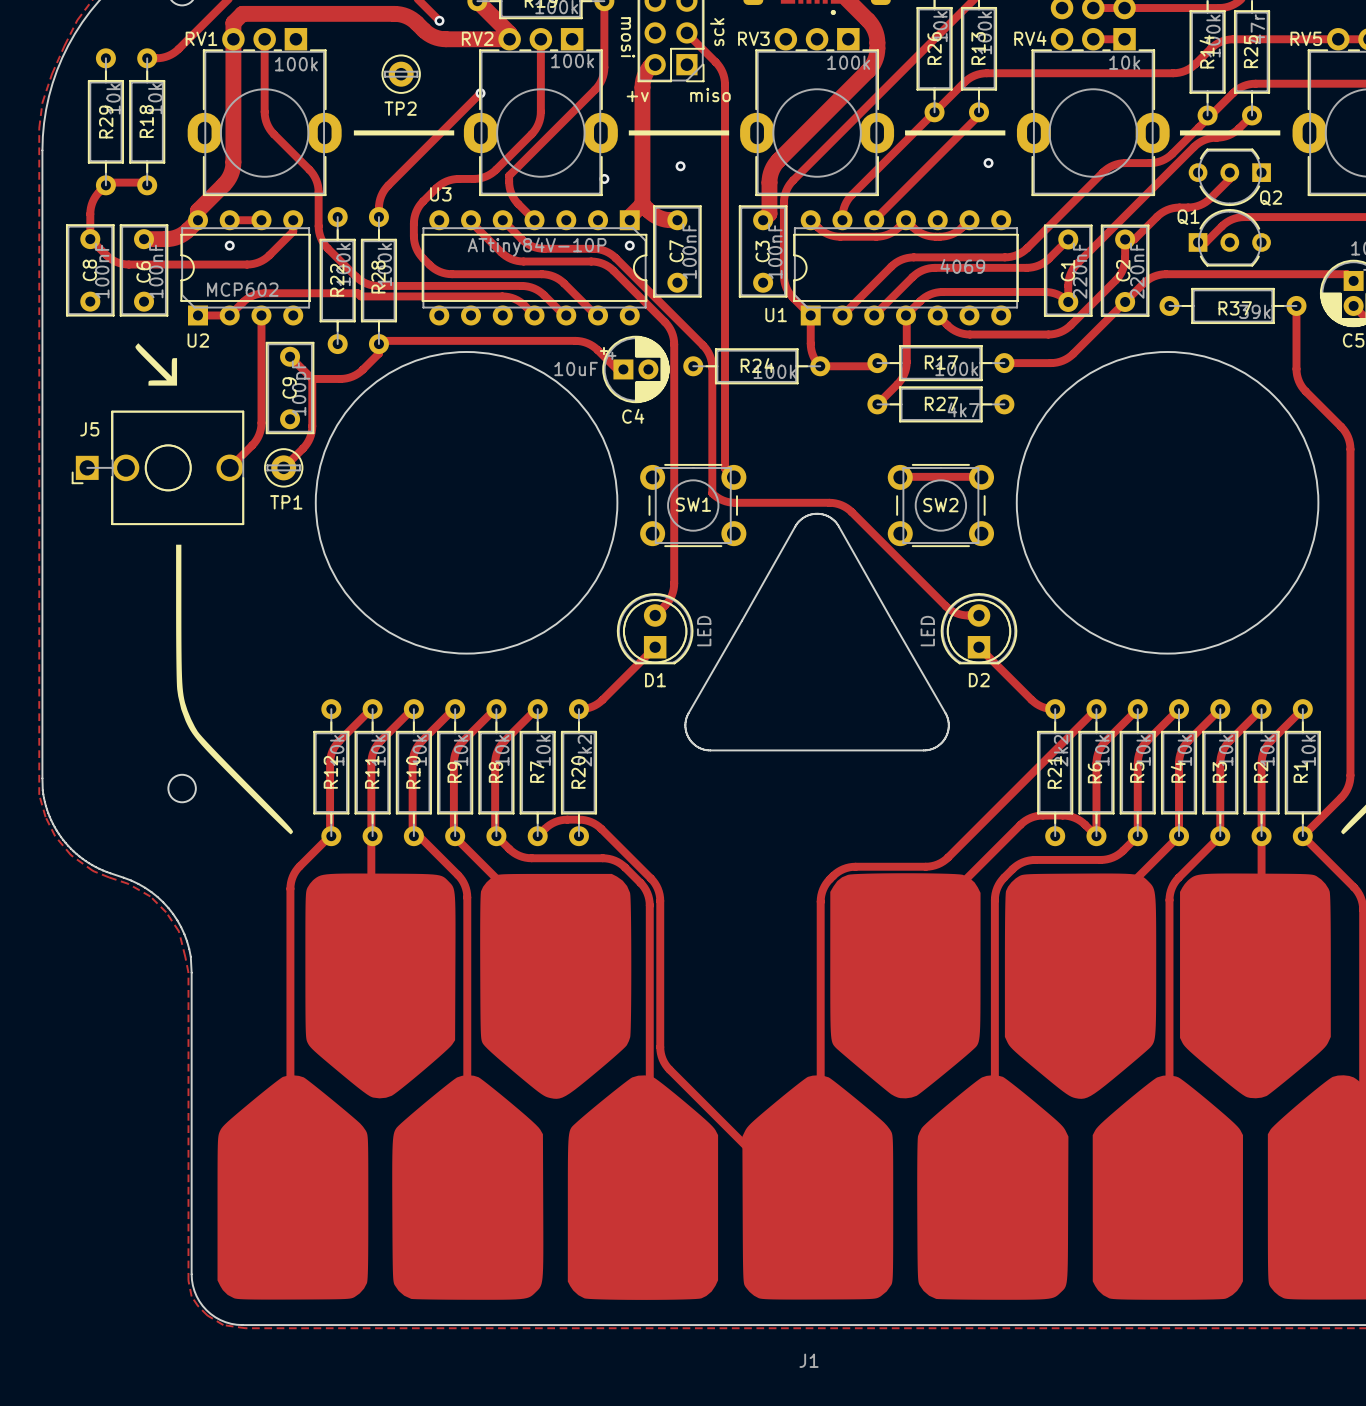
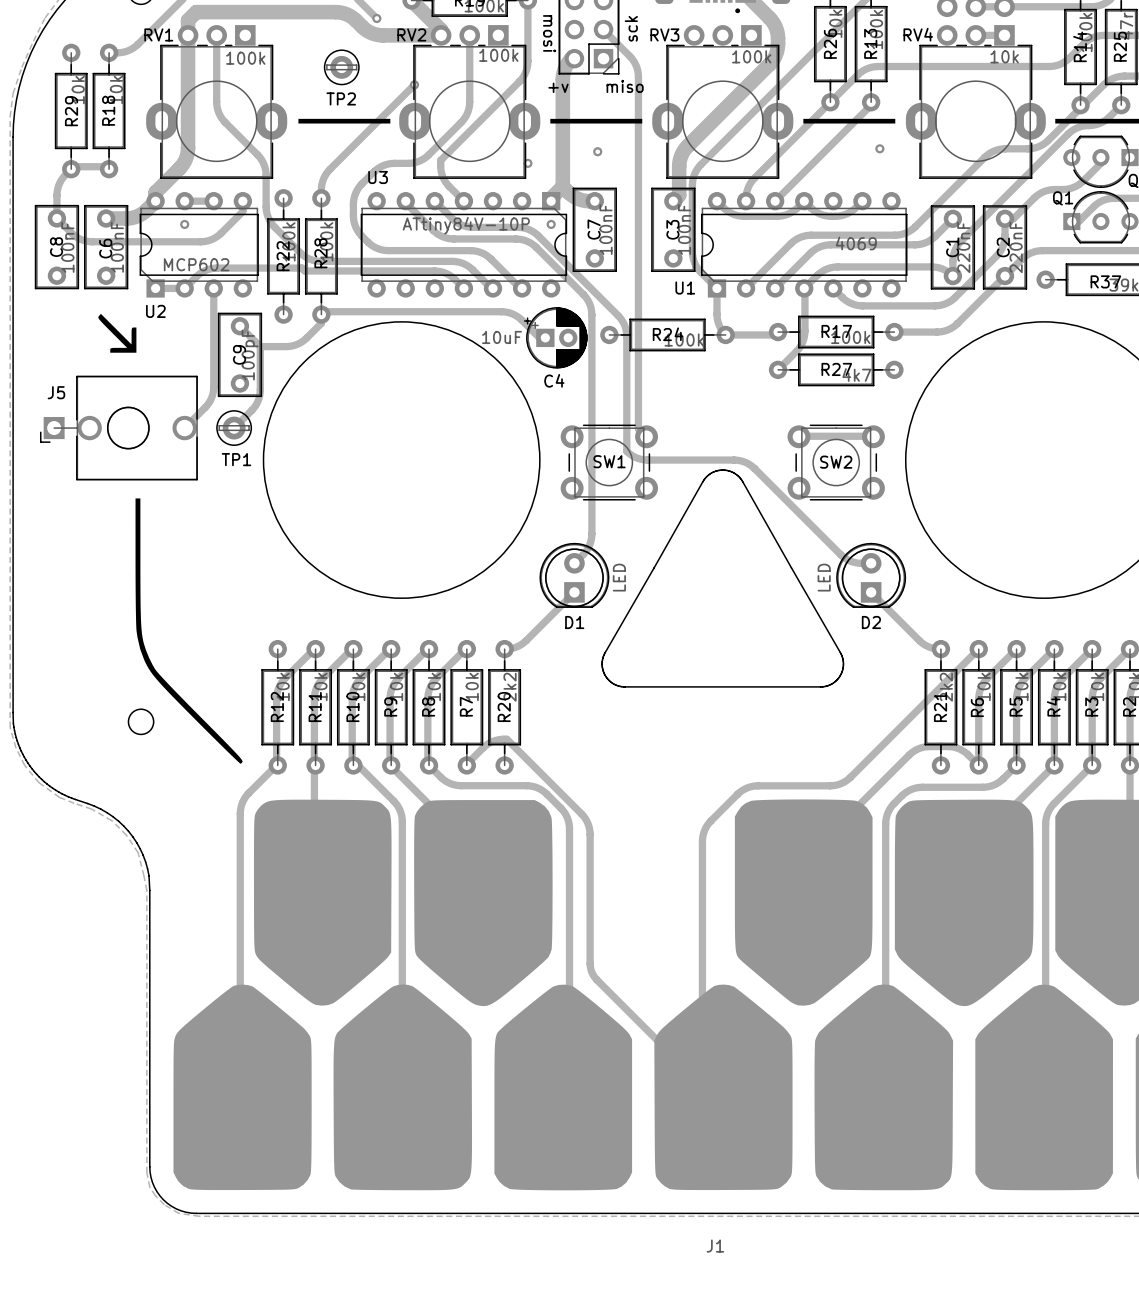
track: none -> (466, 764) (487, 744) (495, 740) (506, 739) (583, 816) (589, 831) (590, 963) (591, 972) (596, 979) (726, 1109)
track: (537, 836) (549, 824) (558, 821) (578, 819) (591, 822) (601, 828) (654, 883) (660, 897) (660, 1047) (664, 1062) (815, 1215) (820, 1215) (820, 901) (823, 889) (833, 876) (846, 868) (931, 866) (943, 861) (956, 849) -> (702, 1089) (702, 841) (705, 827) (737, 794) (749, 787) (832, 785) (841, 783) (850, 777)

